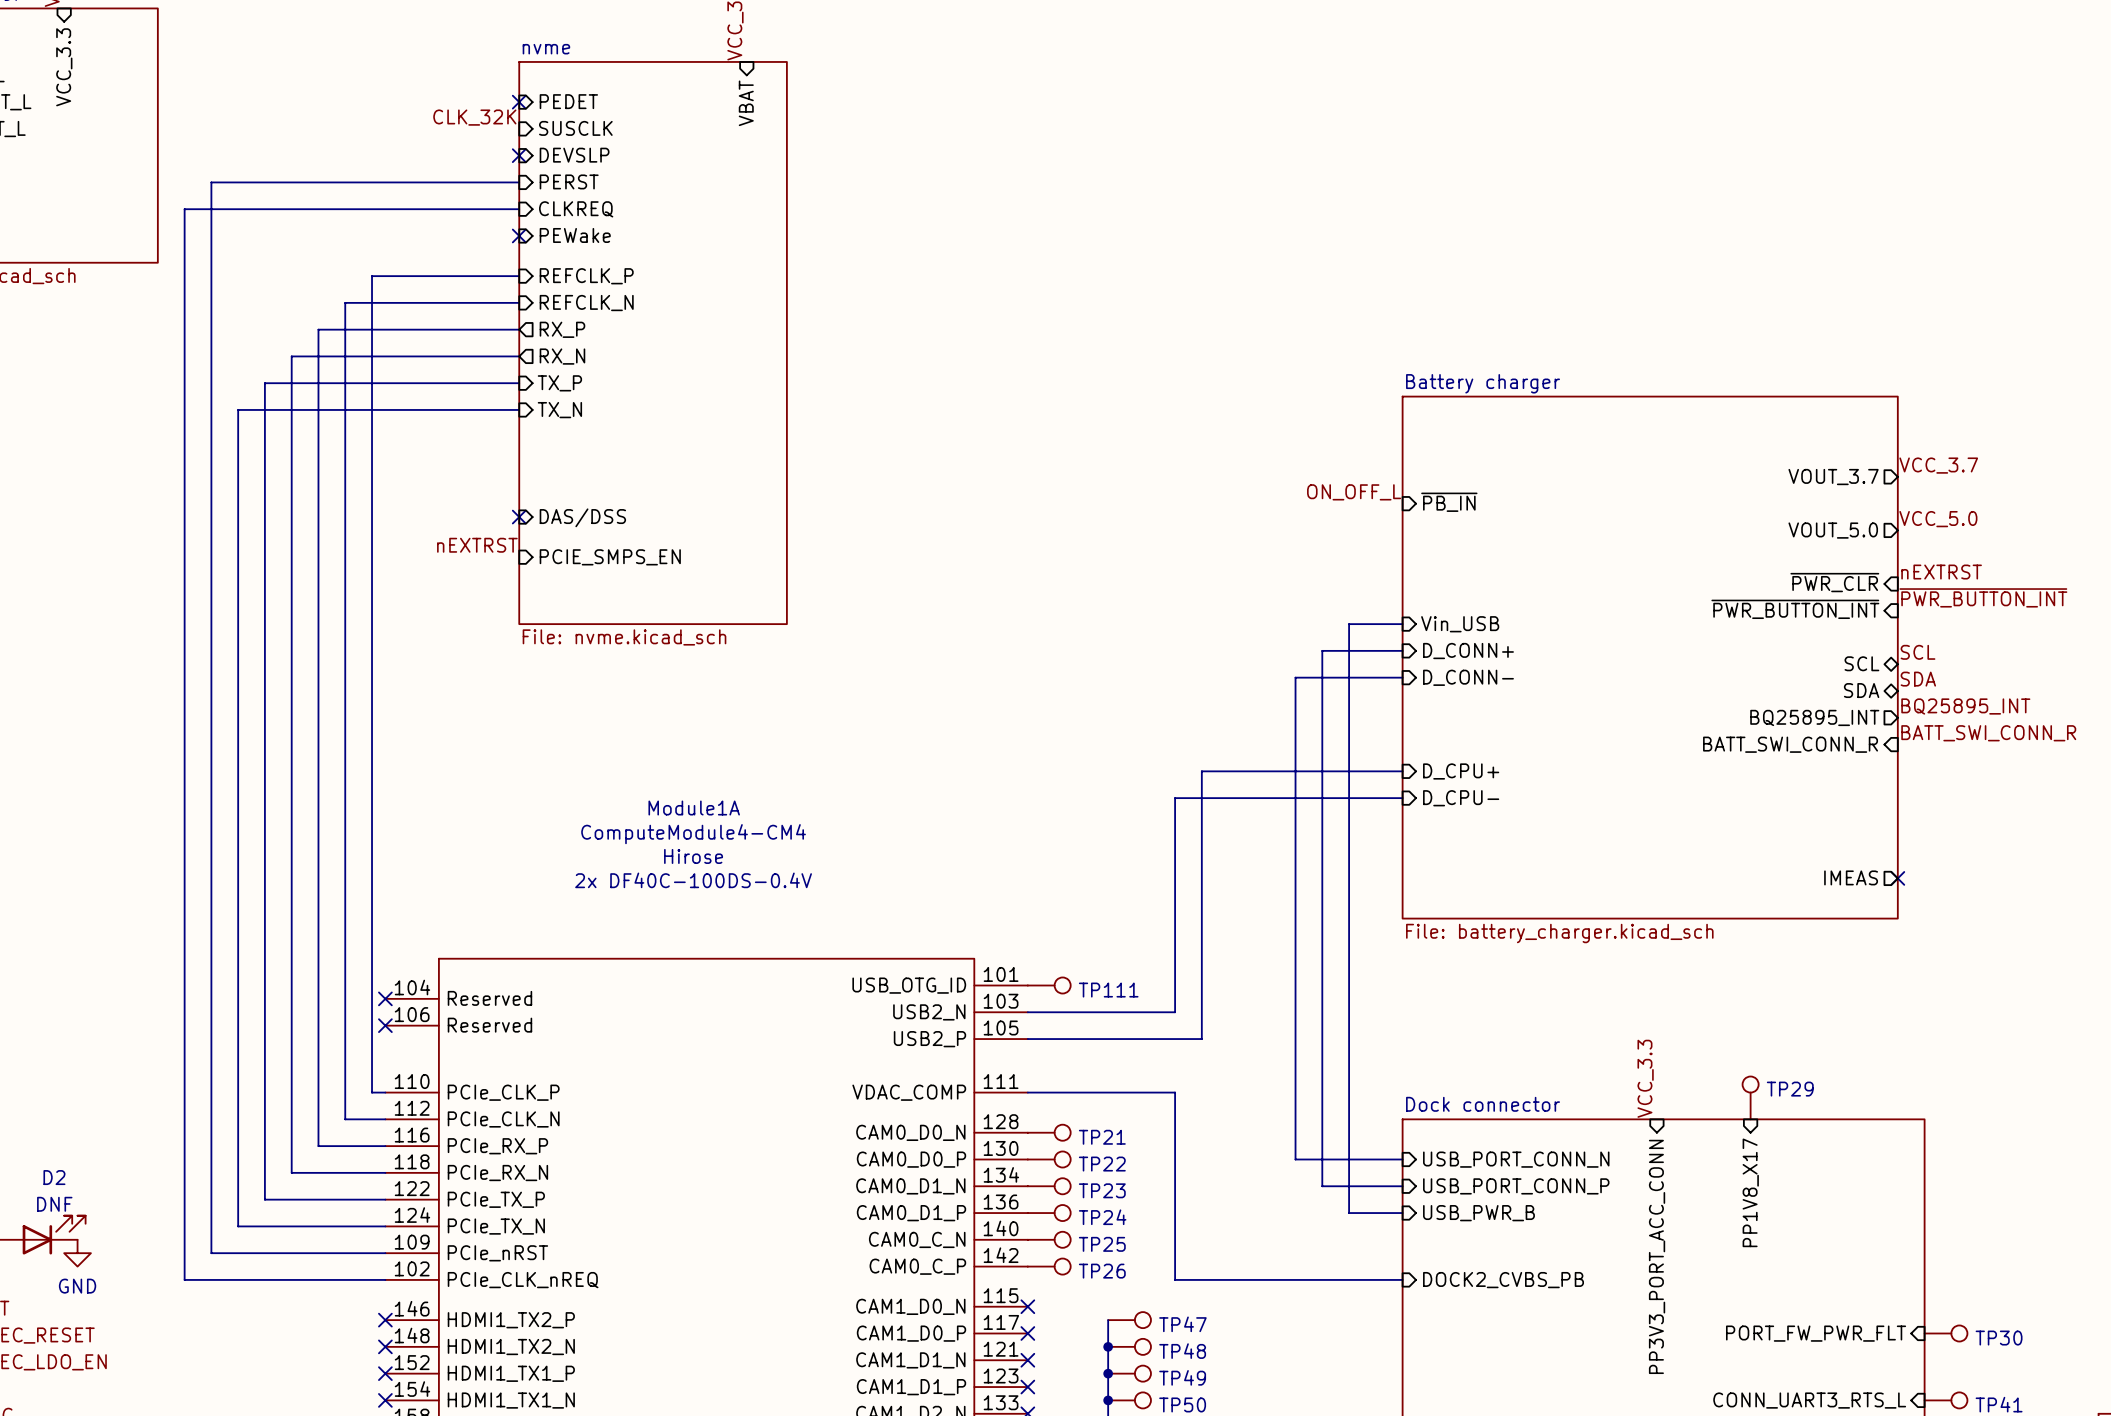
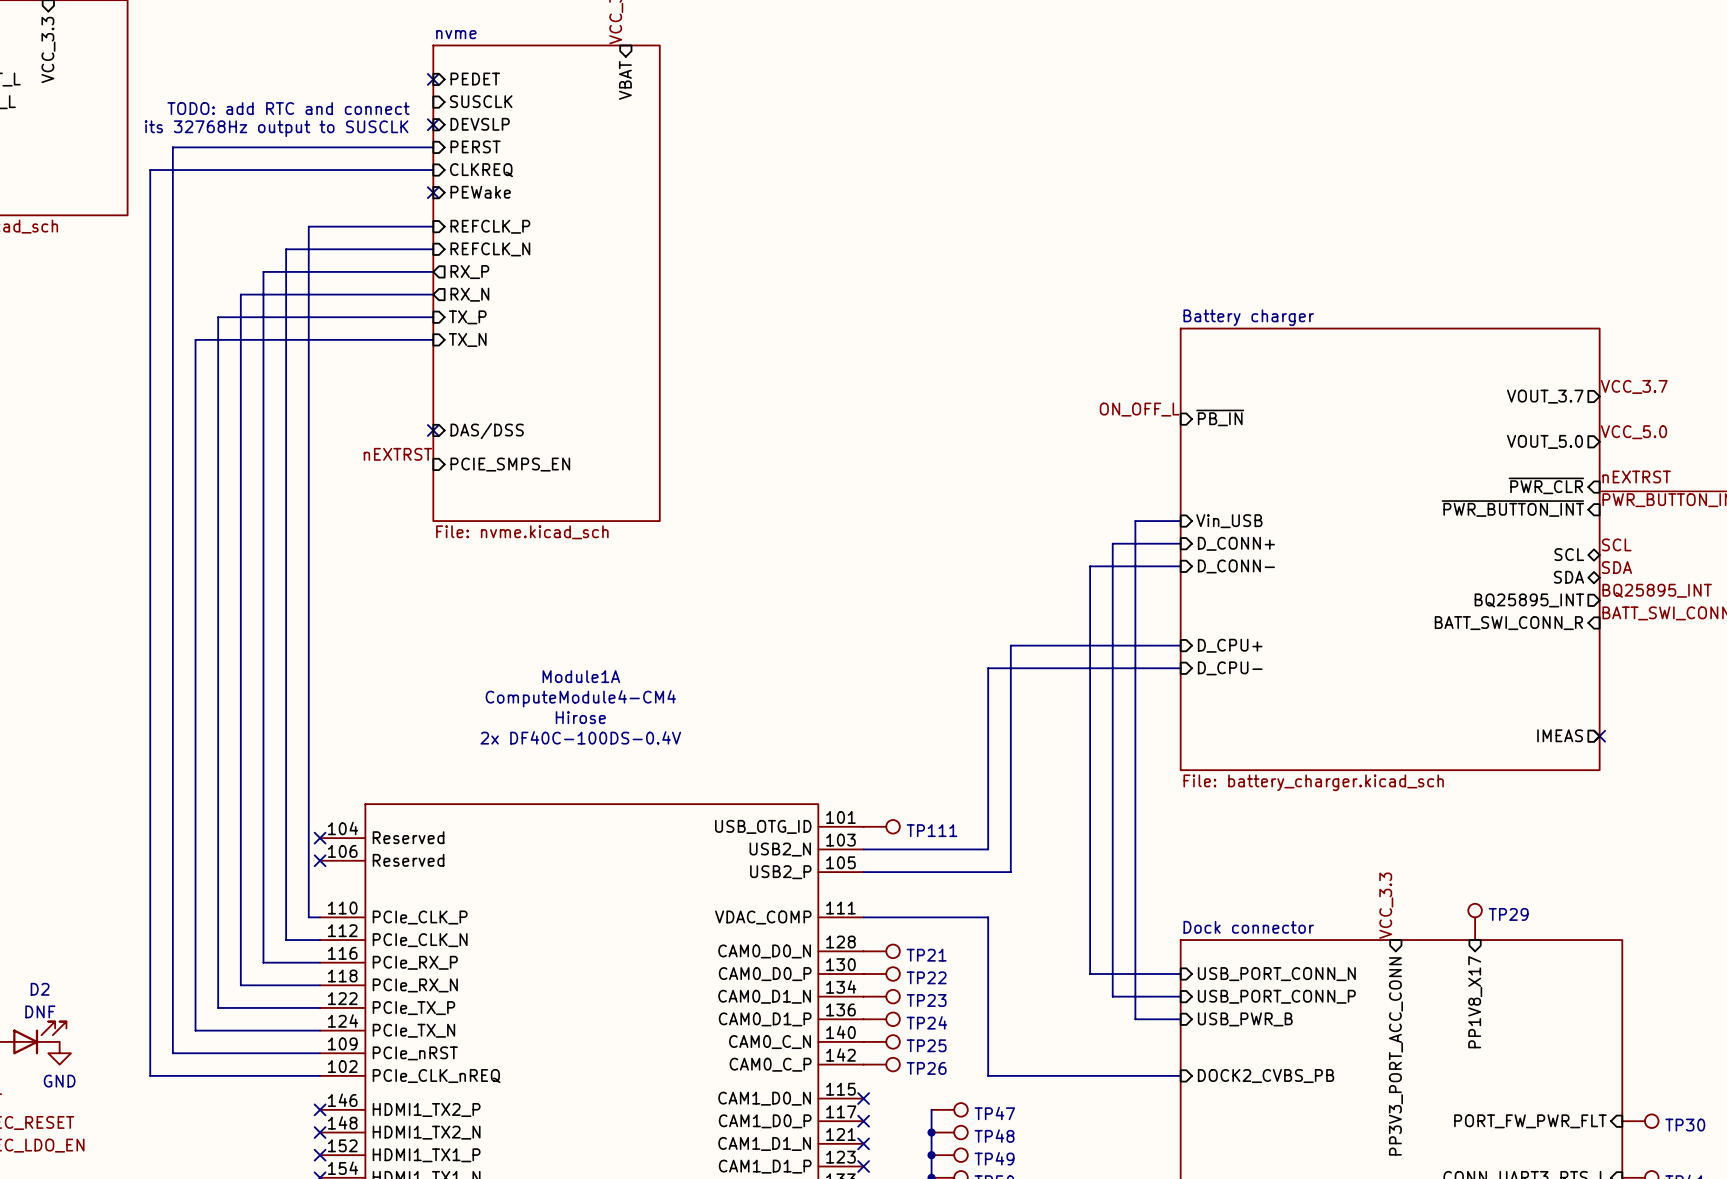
label: CLK_32K (474, 117) -> none
text: none -> TODO: add RTC and connect (288, 108)
text: none -> its 32768Hz output to SUSCLK (276, 128)

